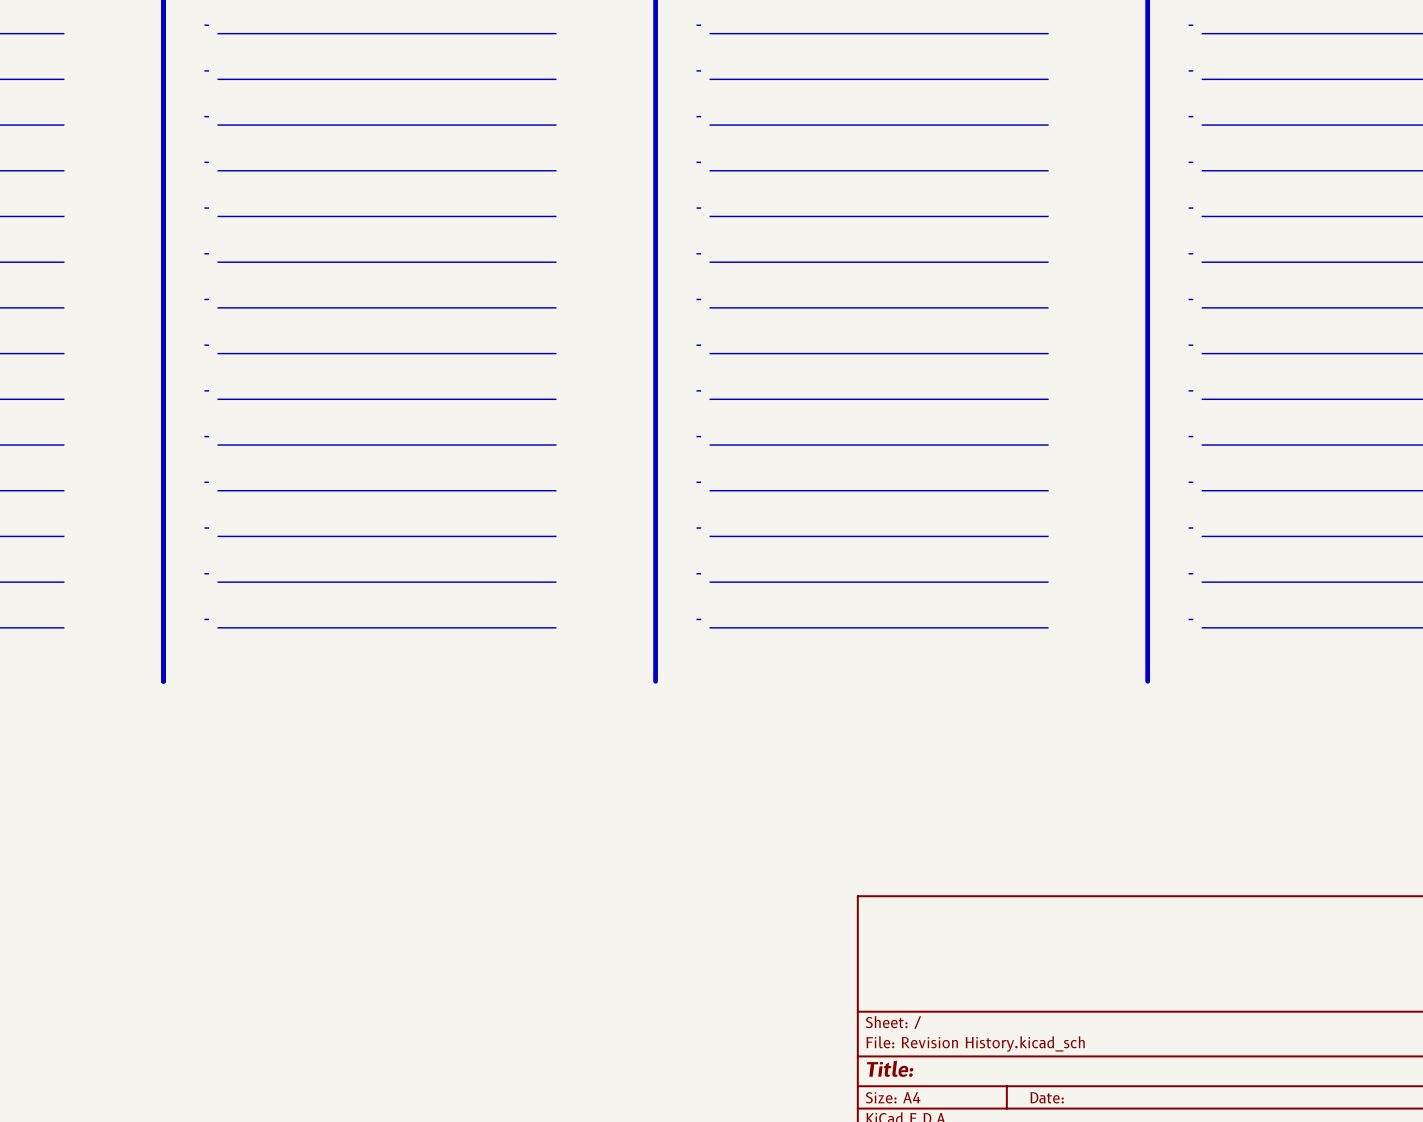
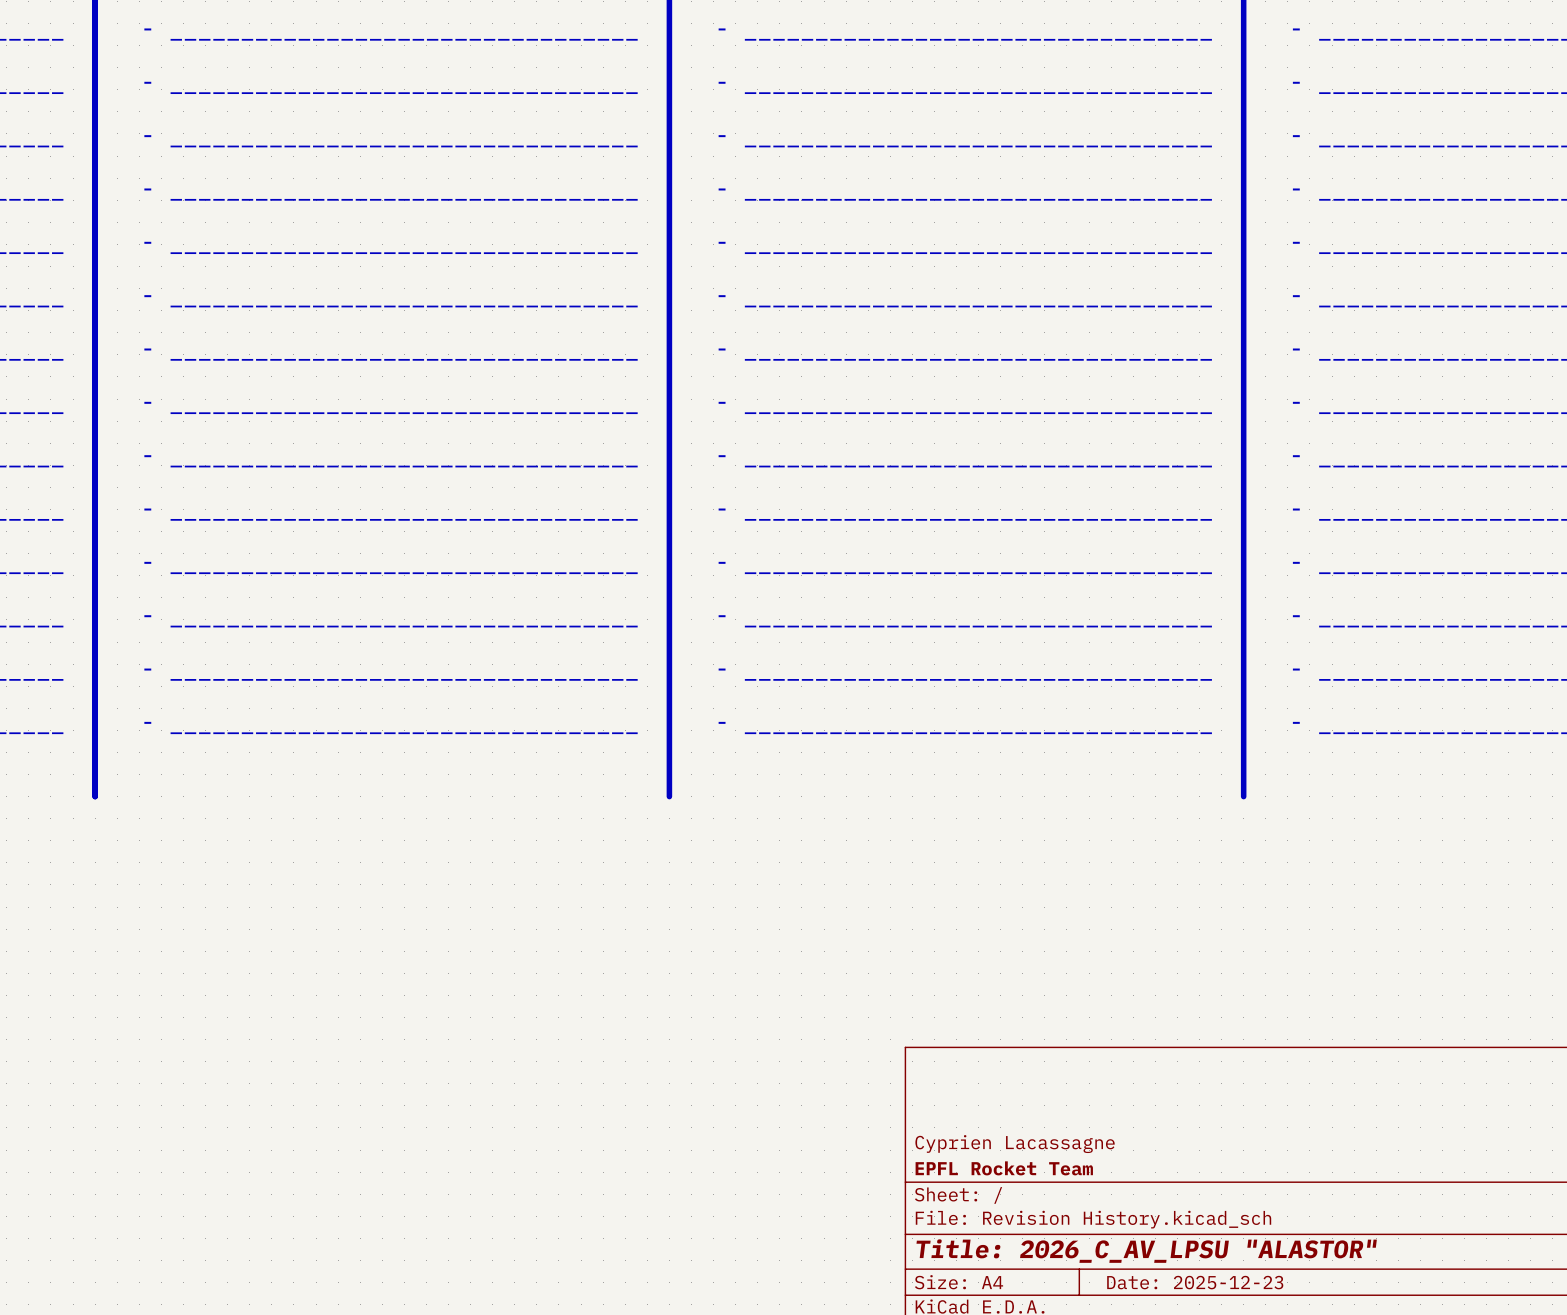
title block: none -> Cyprien Lacassagne (1015, 1144)
title block: none -> EPFL Rocket Team (1004, 1168)
title block: Title: (890, 1068) -> Title: 2026_C_AV_LPSU "ALASTOR" (1146, 1251)
title block: Date: (1047, 1097) -> Date: 2025-12-23 (1195, 1282)

